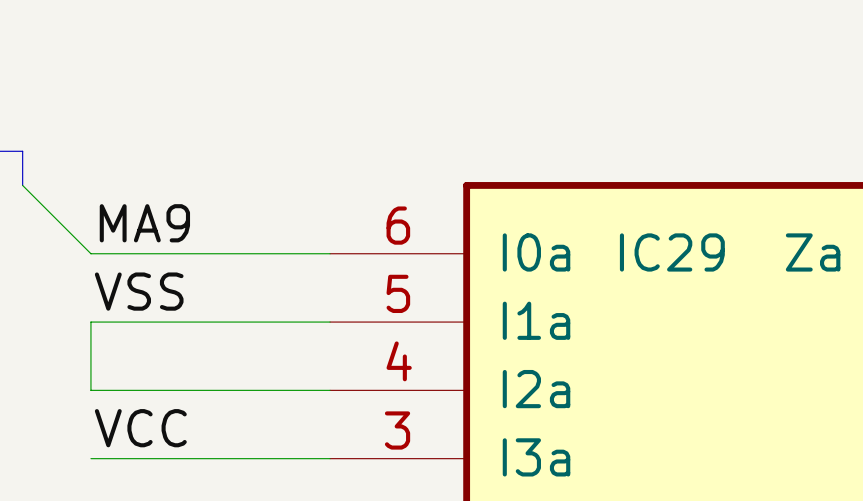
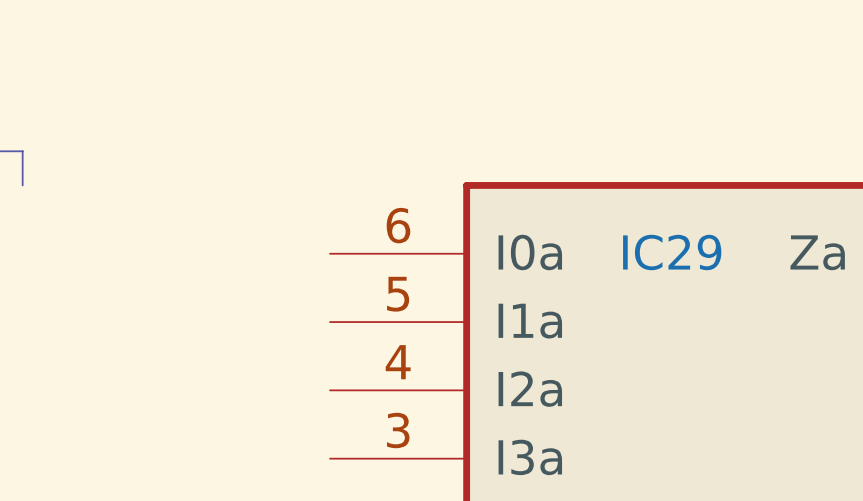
wire: (22, 185) (90, 253) (330, 253) -> none
label: MA9 (144, 223) -> none
label: VSS (139, 291) -> none
wire: (330, 322) (90, 322) (90, 390) (330, 390) -> none
label: VCC (140, 428) -> none
wire: (90, 458) (330, 458) -> none

